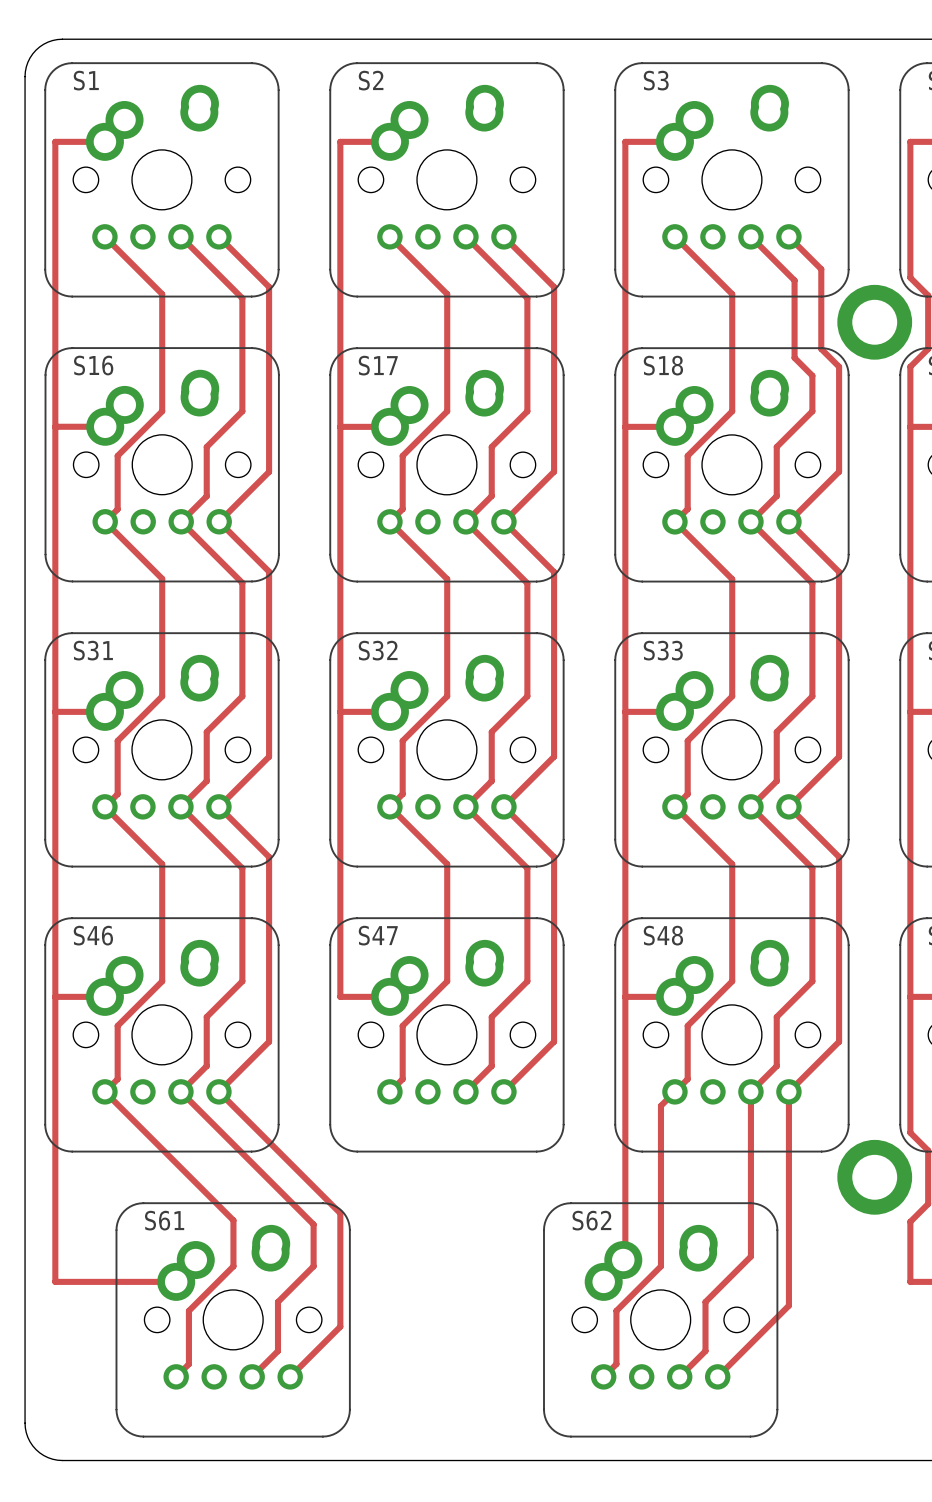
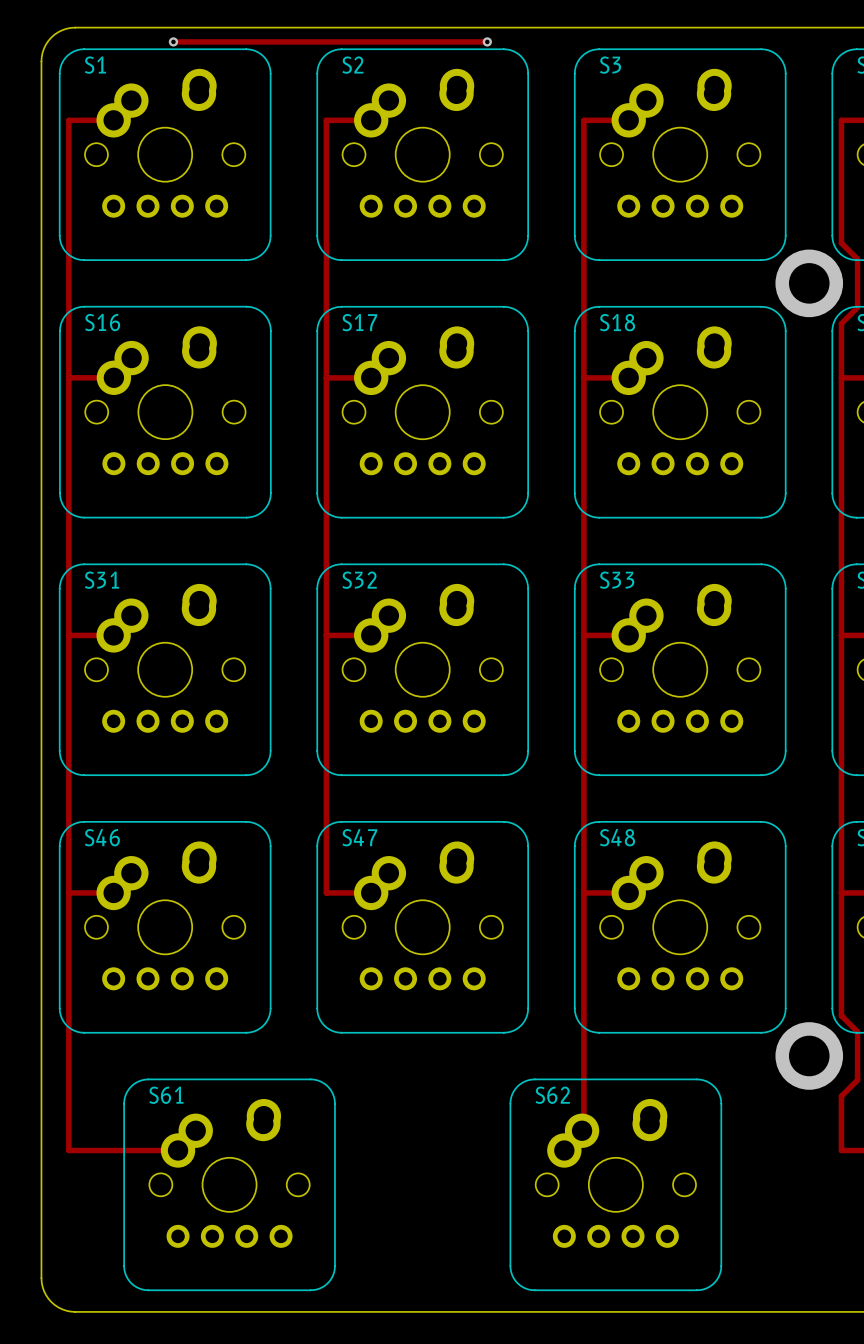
track: none -> (173, 41) (487, 41)
via: none -> (173, 41)
via: none -> (487, 41)
track: (104, 236) (162, 294) (162, 411) (117, 455) (117, 509) (105, 521) (162, 578) (162, 696) (117, 740) (117, 794) (104, 806) (162, 864) (162, 981) (117, 1025) (117, 1079) (104, 1091) (233, 1220) (233, 1266) (188, 1310) (188, 1364) (176, 1376) -> none
track: (180, 236) (242, 298) (242, 411) (206, 446) (206, 496) (181, 521) (242, 582) (242, 696) (206, 731) (206, 781) (180, 806) (242, 868) (242, 981) (206, 1016) (206, 1066) (180, 1091) (313, 1224) (313, 1266) (277, 1301) (277, 1351) (252, 1376) -> none
track: (218, 236) (269, 287) (269, 471) (219, 521) (269, 571) (269, 756) (218, 806) (269, 857) (269, 1041) (218, 1091) (340, 1213) (340, 1326) (290, 1376) -> none
track: (389, 236) (447, 294) (447, 411) (402, 455) (402, 509) (389, 521) (447, 579) (447, 696) (402, 740) (402, 794) (389, 806) (447, 864) (447, 981) (402, 1025) (402, 1079) (389, 1091) -> none
track: (465, 236) (527, 298) (527, 411) (491, 446) (491, 496) (465, 521) (527, 583) (527, 696) (491, 731) (491, 781) (465, 806) (527, 868) (527, 981) (491, 1016) (491, 1066) (465, 1091) -> none
track: (503, 236) (554, 287) (554, 471) (503, 521) (554, 572) (554, 756) (503, 806) (554, 857) (554, 1041) (503, 1091) -> none
track: (674, 236) (732, 294) (732, 411) (687, 455) (687, 509) (674, 521) (732, 579) (732, 696) (687, 740) (687, 794) (674, 806) (732, 864) (732, 981) (687, 1025) (687, 1079) (660, 1105) (660, 1266) (616, 1310) (616, 1364) (603, 1376) -> none
track: (750, 236) (794, 280) (794, 357) (812, 375) (812, 411) (776, 446) (776, 496) (750, 521) (812, 583) (812, 696) (776, 731) (776, 781) (750, 806) (812, 868) (812, 981) (776, 1016) (776, 1066) (750, 1091) (750, 1256) (705, 1301) (705, 1351) (679, 1376) -> none
track: (788, 236) (821, 269) (821, 348) (839, 366) (839, 471) (788, 521) (839, 572) (839, 756) (788, 806) (839, 857) (839, 1041) (788, 1091) (788, 1305) (717, 1376) -> none

